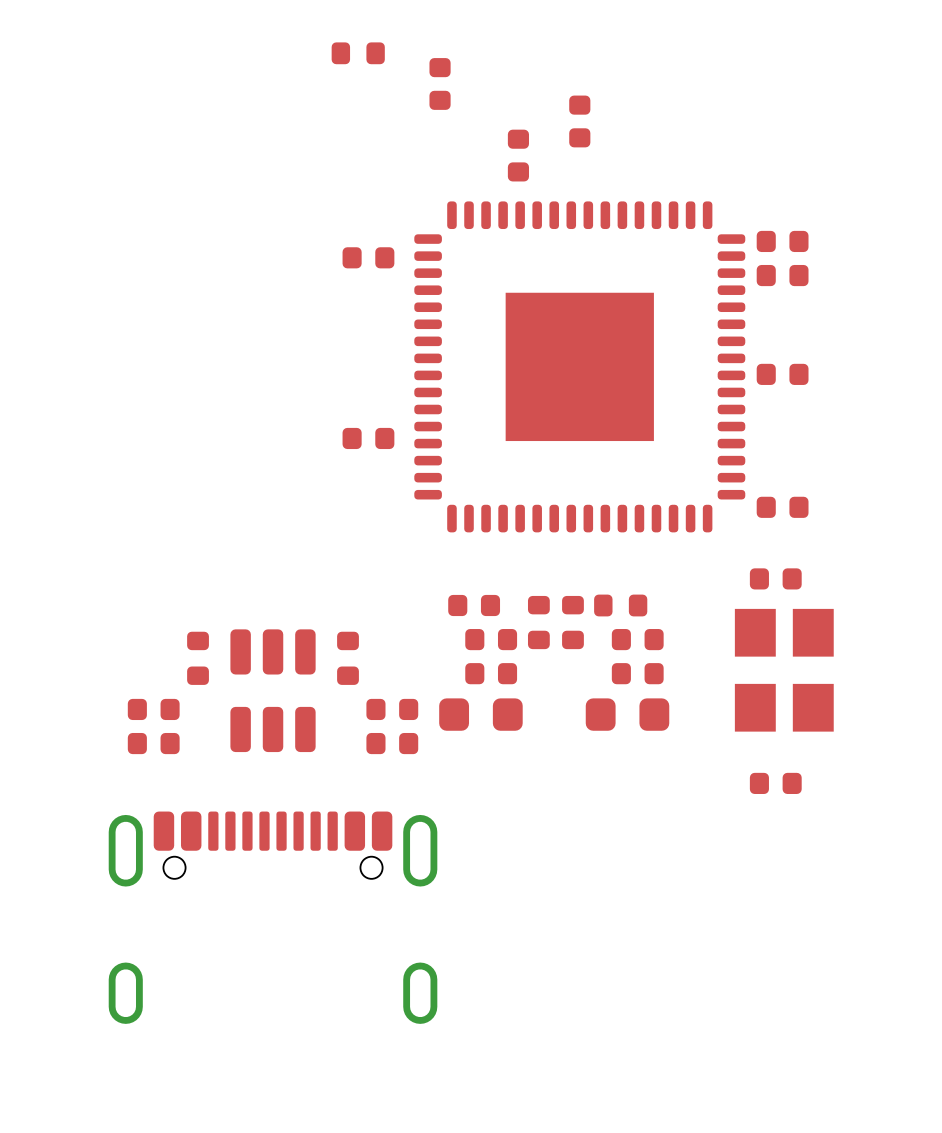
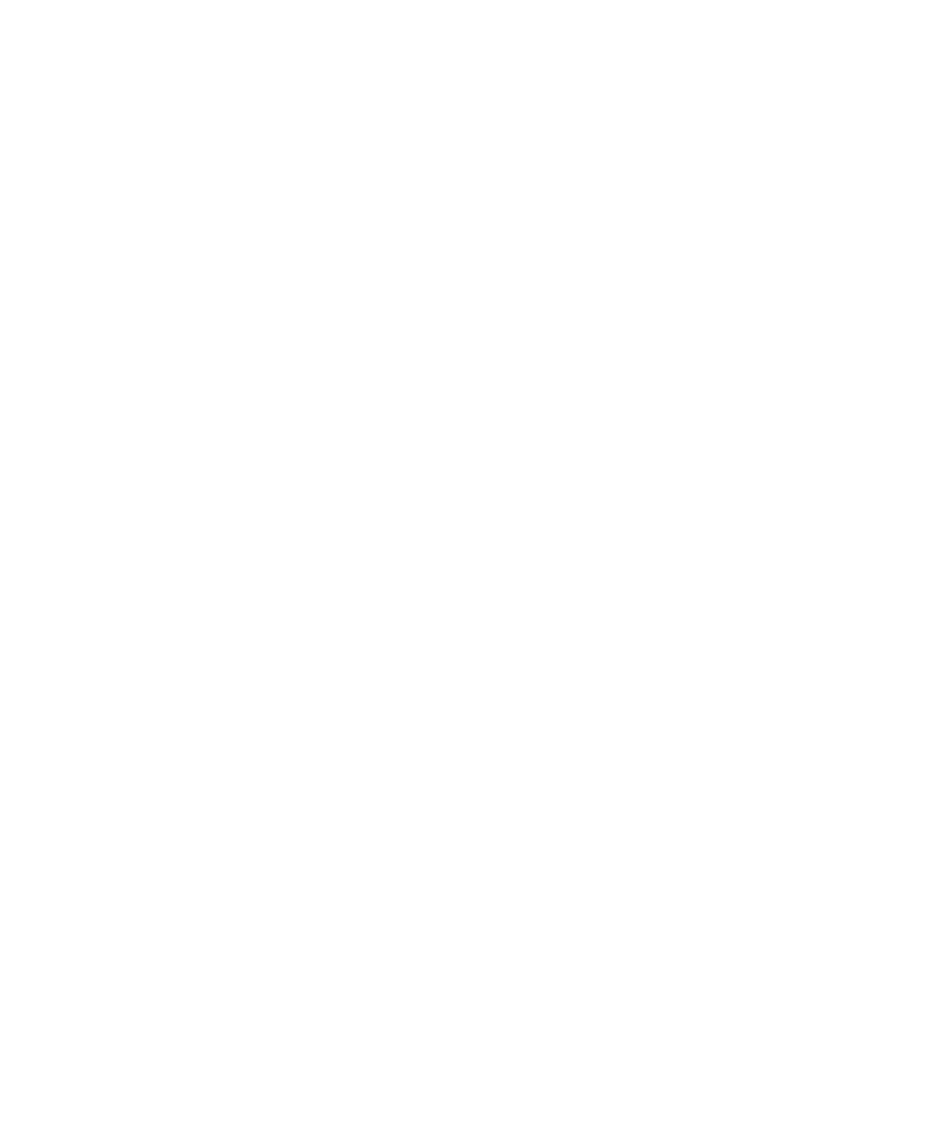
part: (358, 53) -> none
part: (440, 83) -> none
part: (579, 121) -> none
part: (518, 155) -> none
part: (782, 241) -> none
part: (368, 257) -> none
part: (782, 275) -> none
part: (579, 366) -> none
part: (782, 374) -> none
part: (368, 438) -> none
part: (782, 507) -> none
part: (775, 578) -> none
part: (474, 605) -> none
part: (620, 605) -> none
part: (538, 622) -> none
part: (572, 622) -> none
part: (491, 639) -> none
part: (637, 639) -> none
part: (198, 658) -> none
part: (348, 658) -> none
part: (784, 670) -> none
part: (491, 673) -> none
part: (637, 673) -> none
part: (273, 690) -> none
part: (153, 709) -> none
part: (392, 709) -> none
part: (480, 714) -> none
part: (627, 714) -> none
part: (153, 743) -> none
part: (392, 743) -> none
part: (775, 783) -> none
part: (273, 917) -> none

